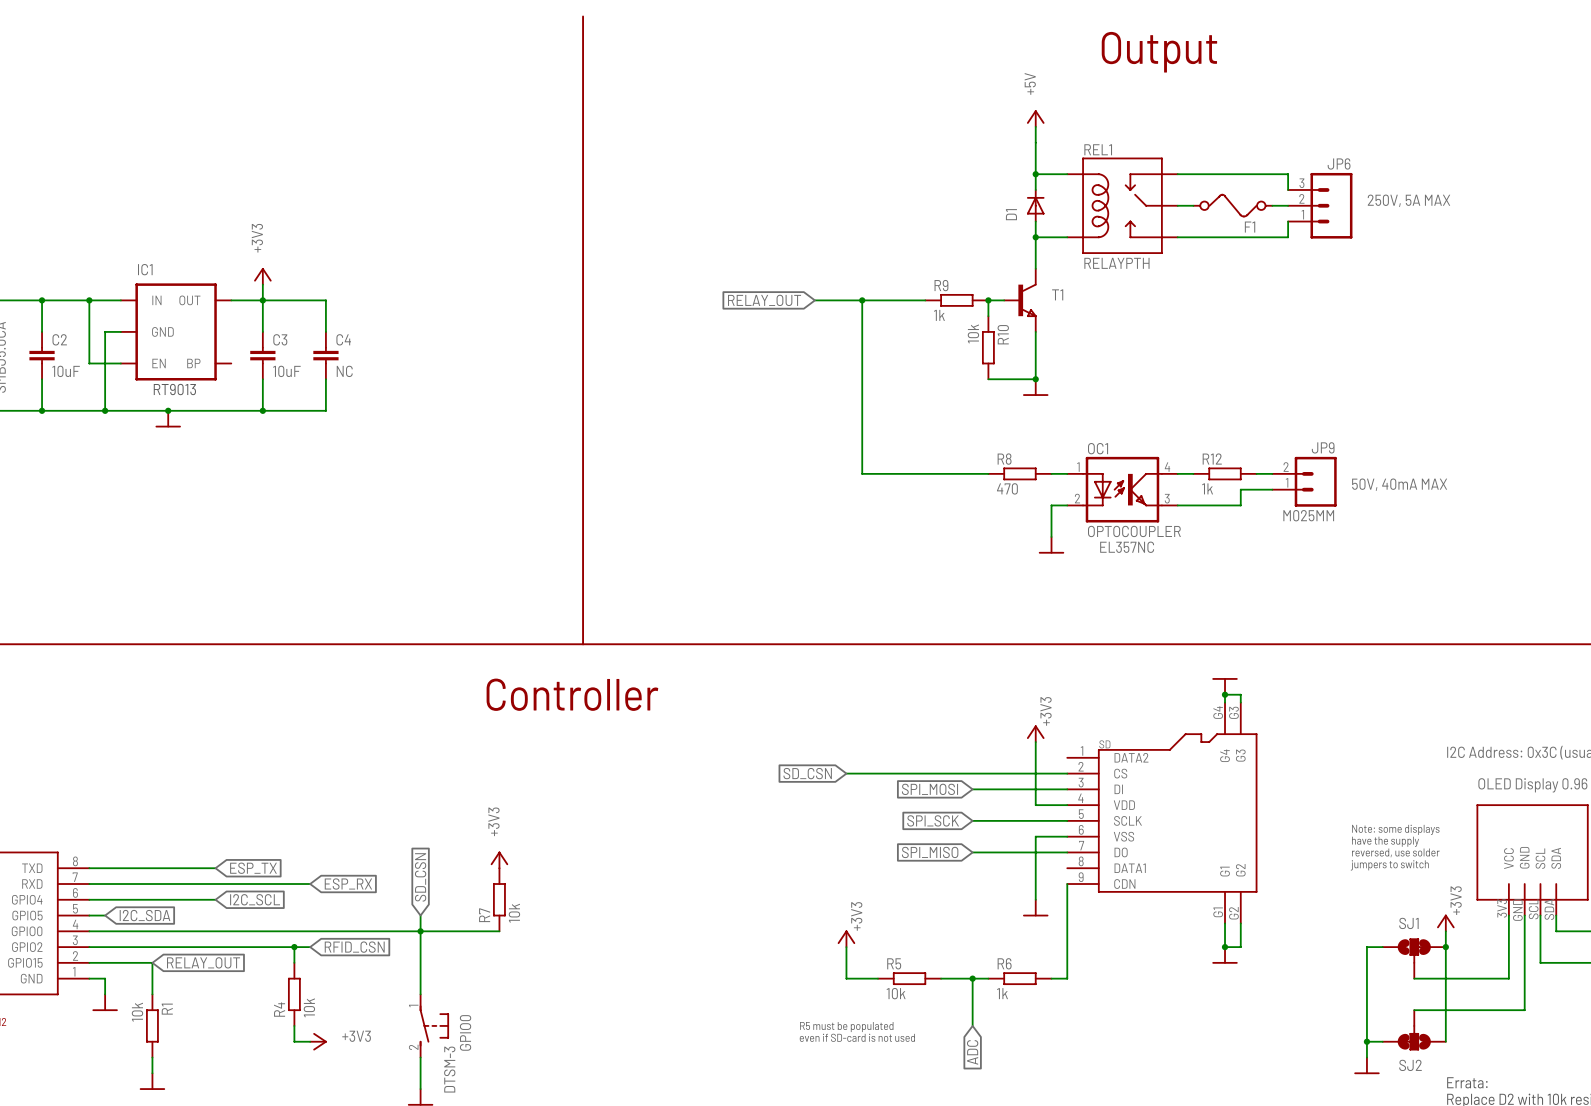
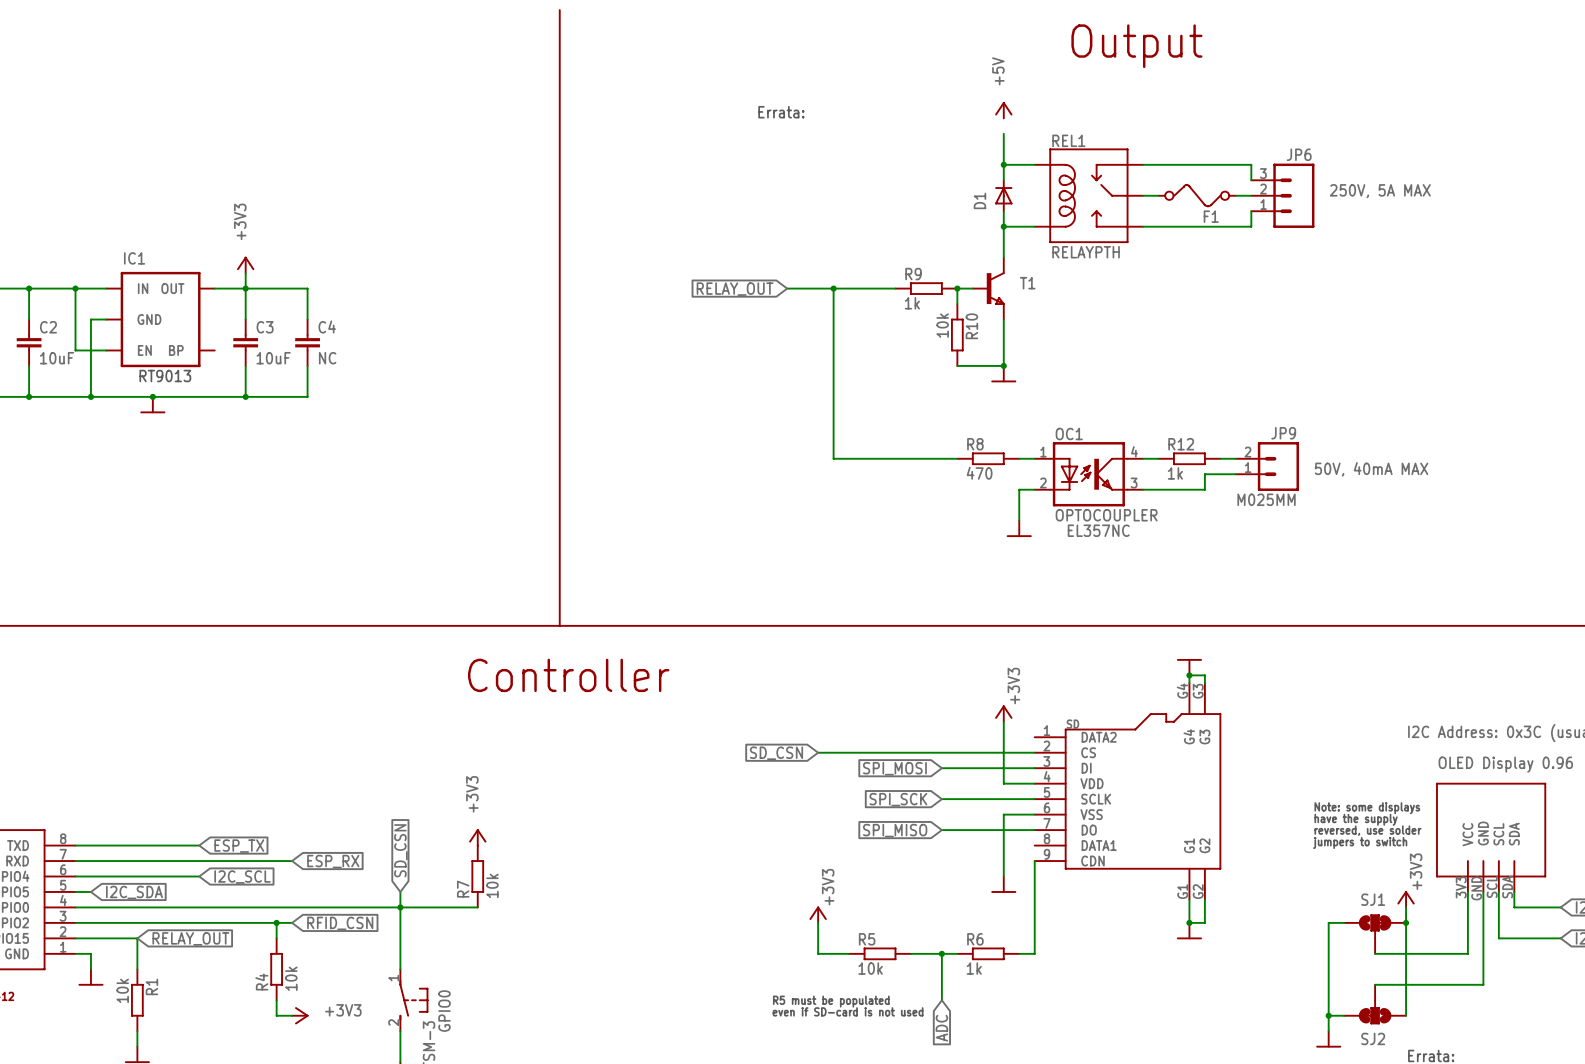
text: none -> Errata: (781, 112)
wire: (1035, 126) (1035, 142) -> none

